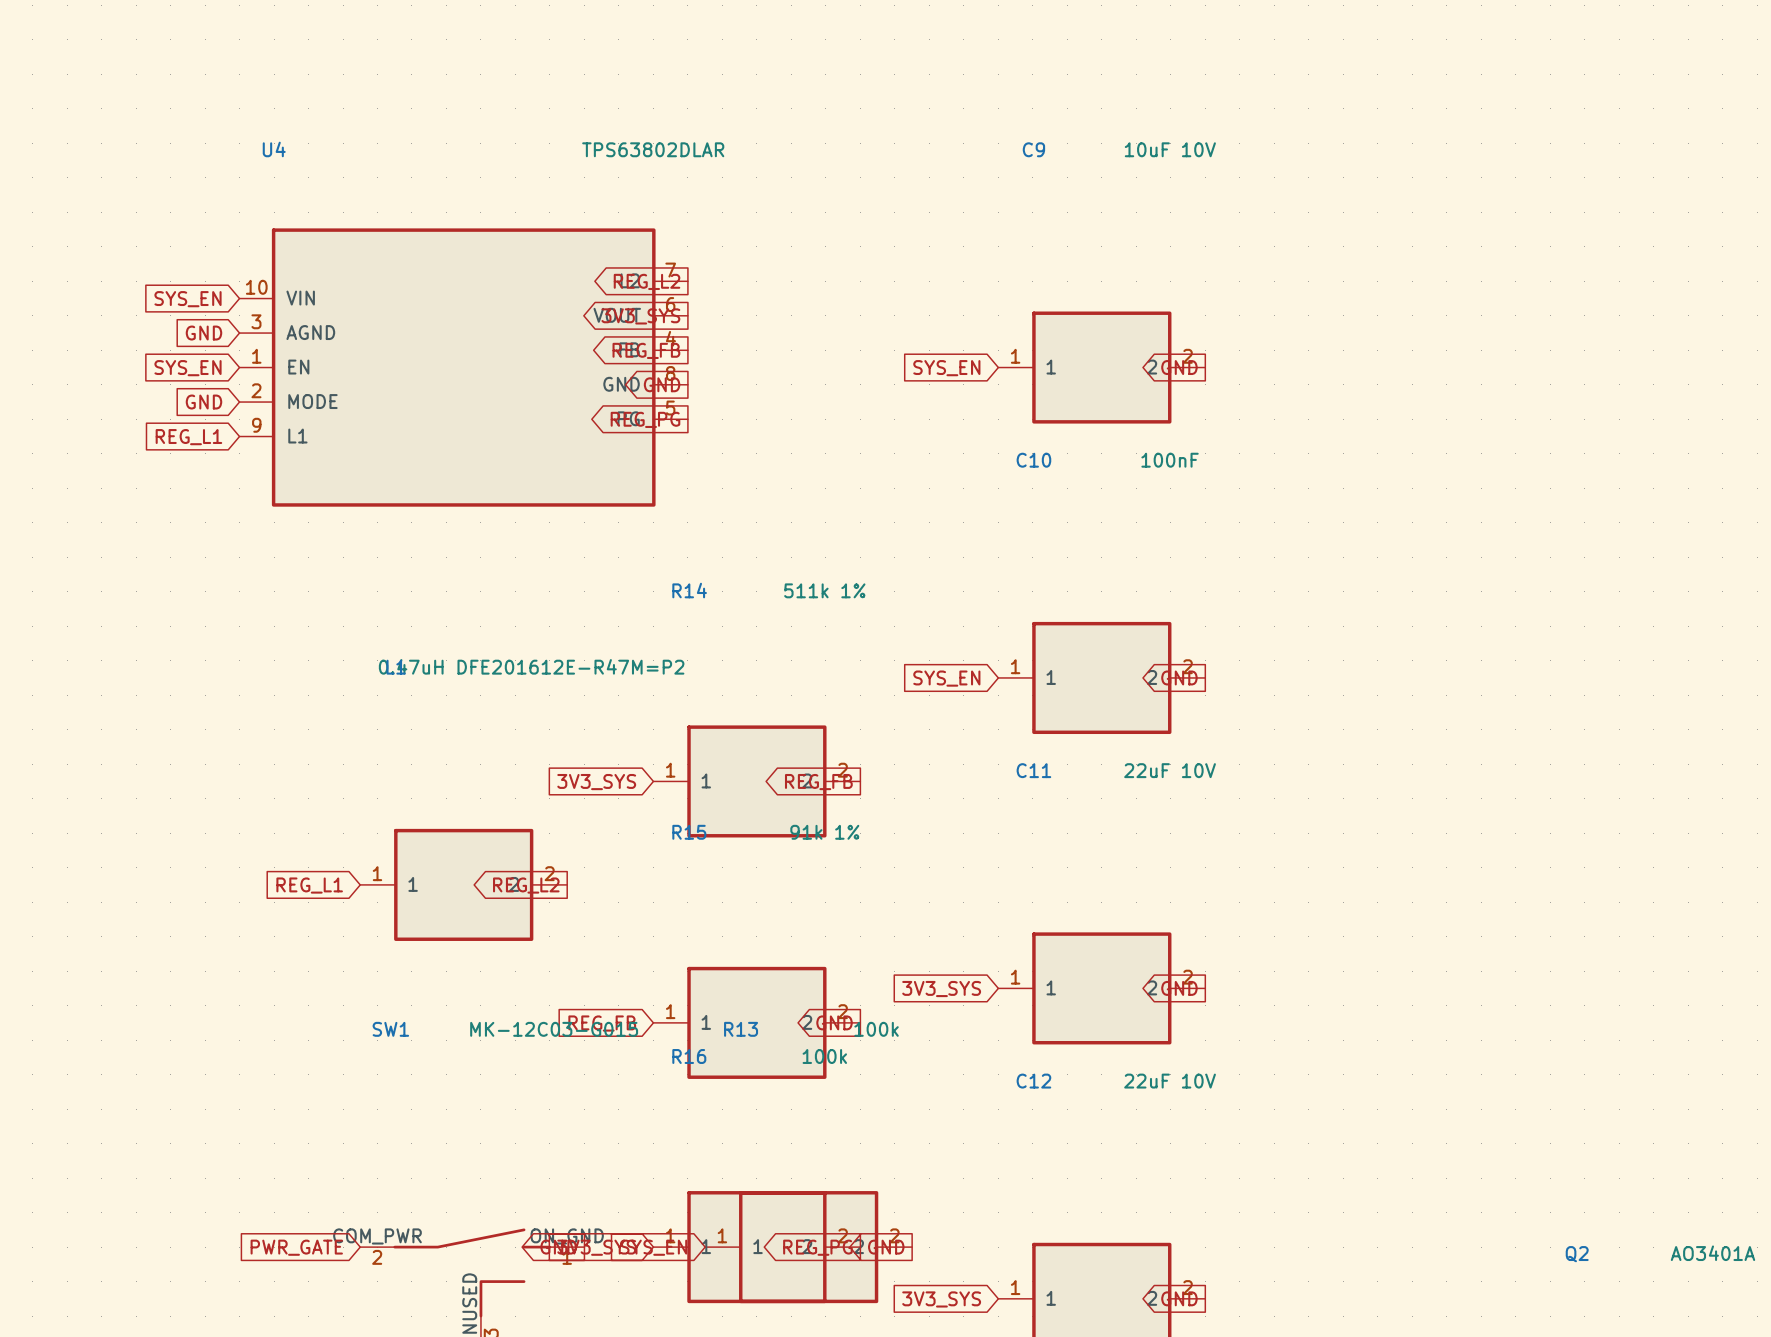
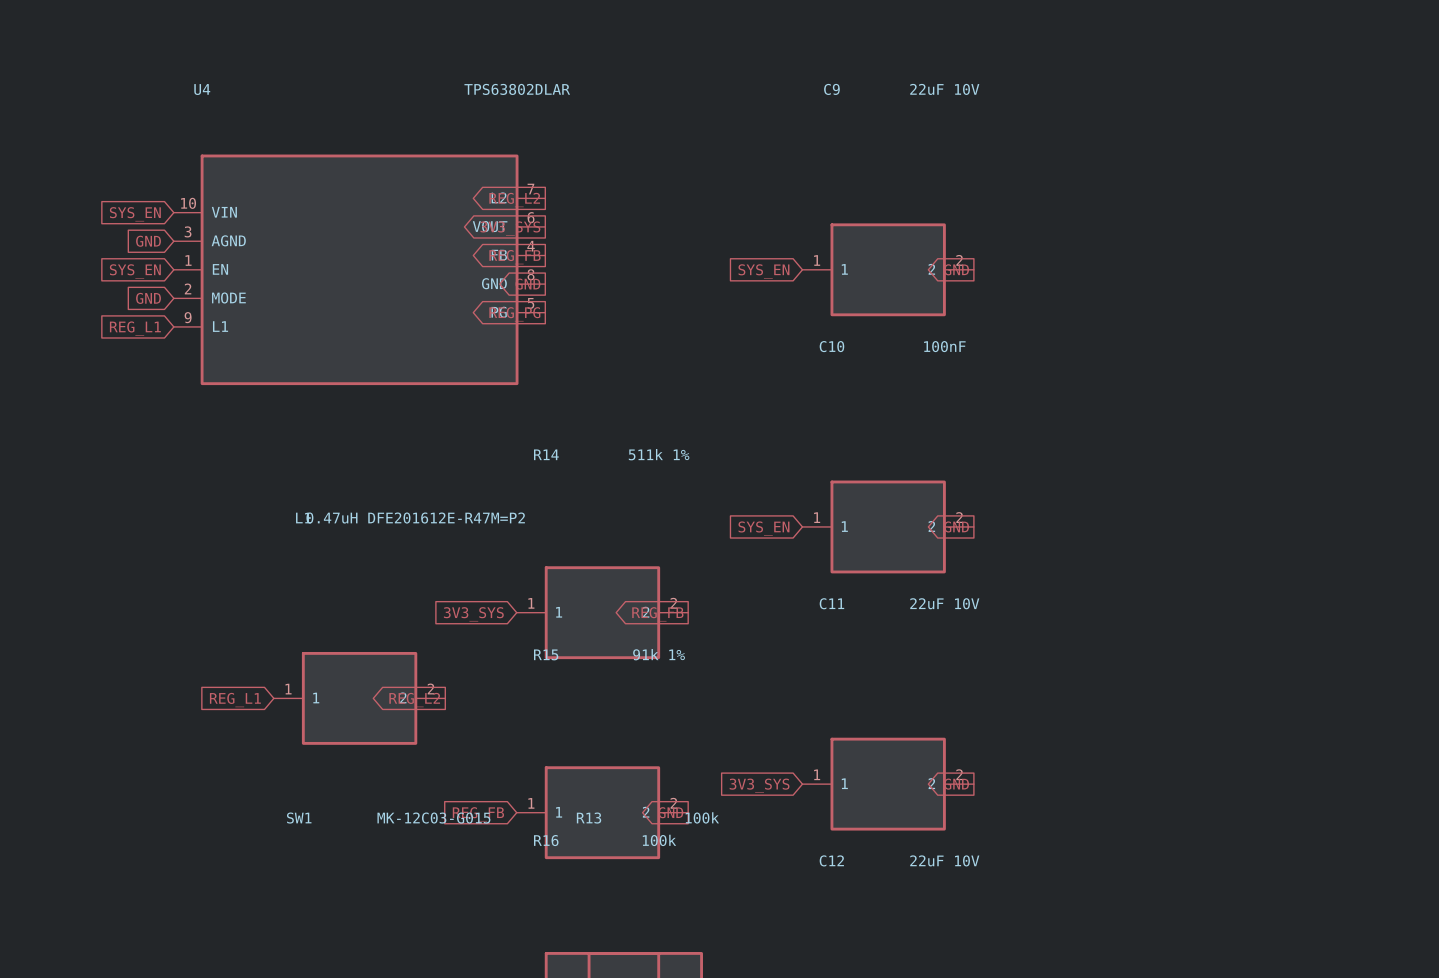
C9 value: 10uF 10V (1170, 149) -> 22uF 10V (944, 89)

